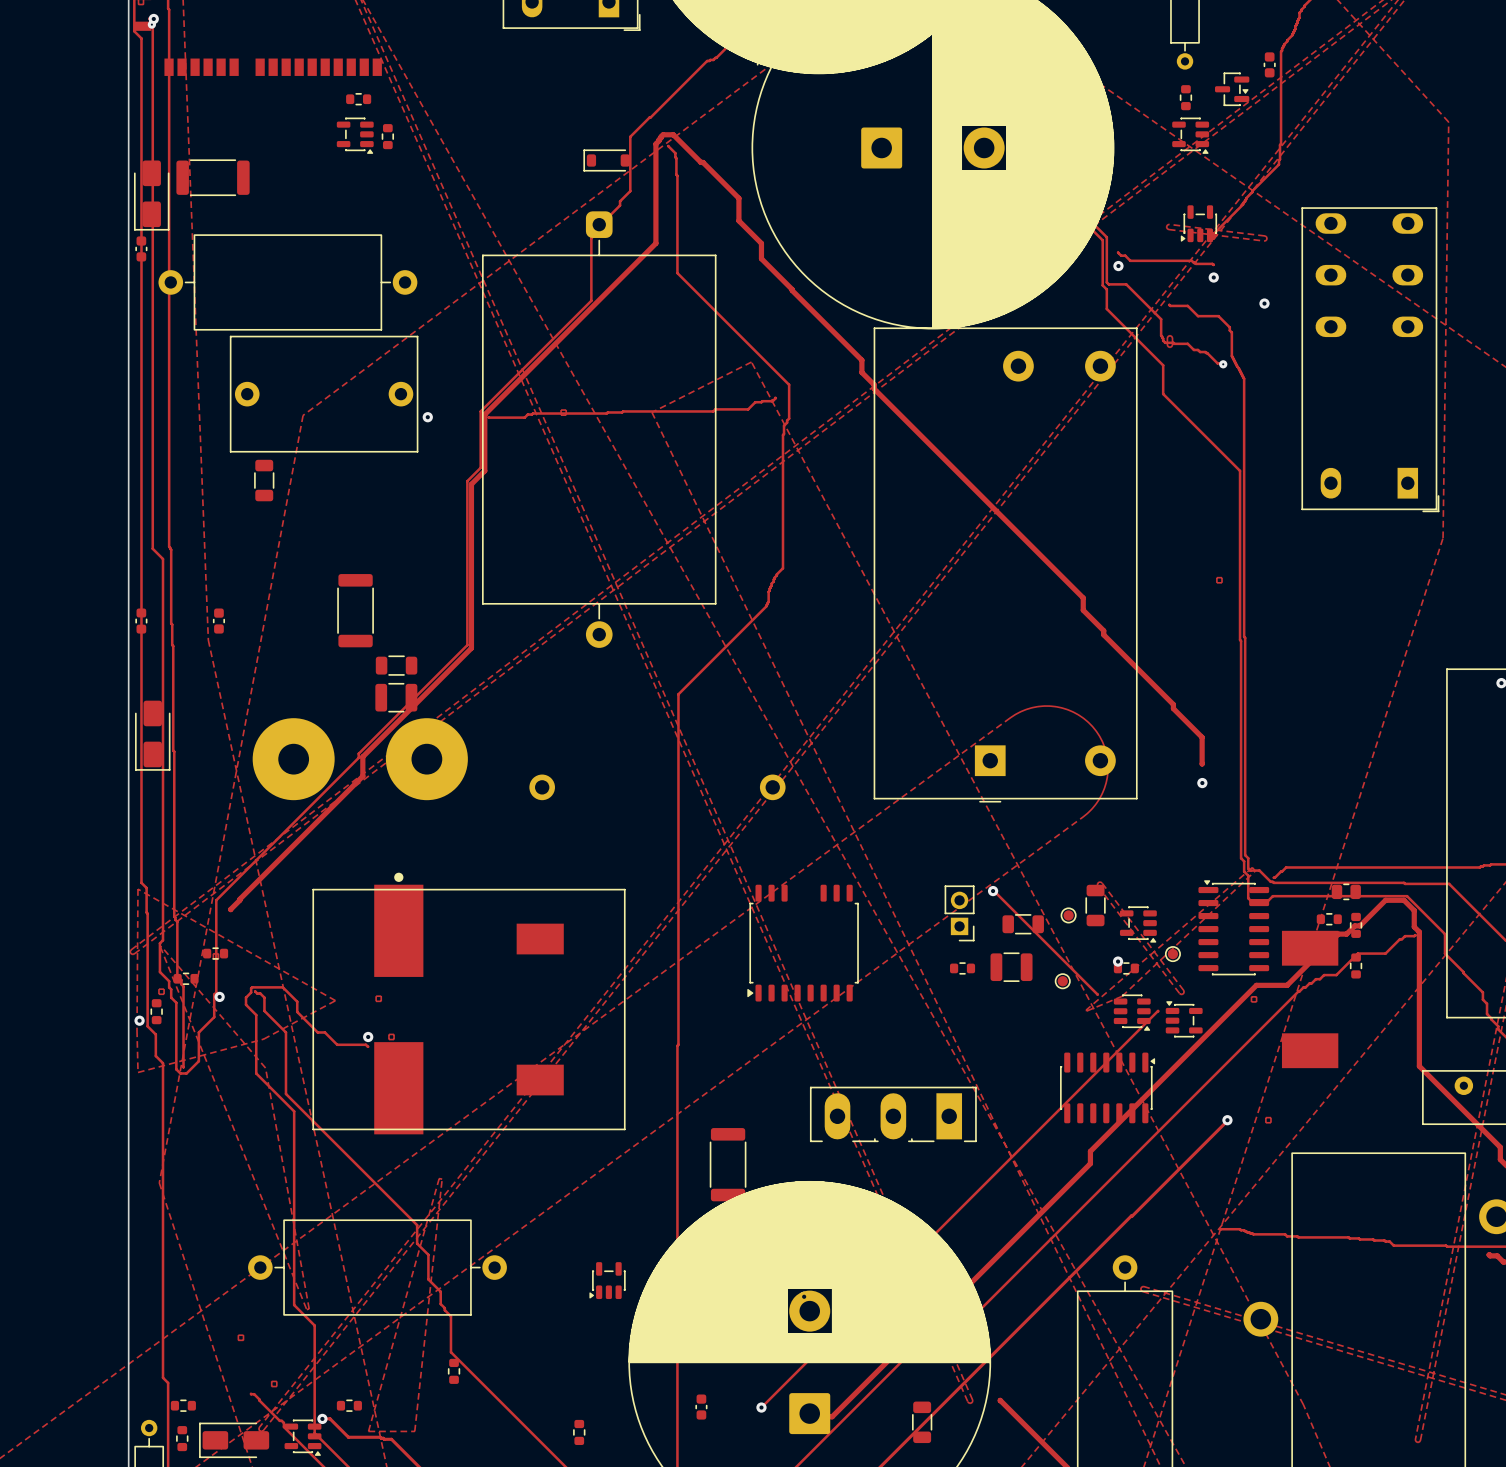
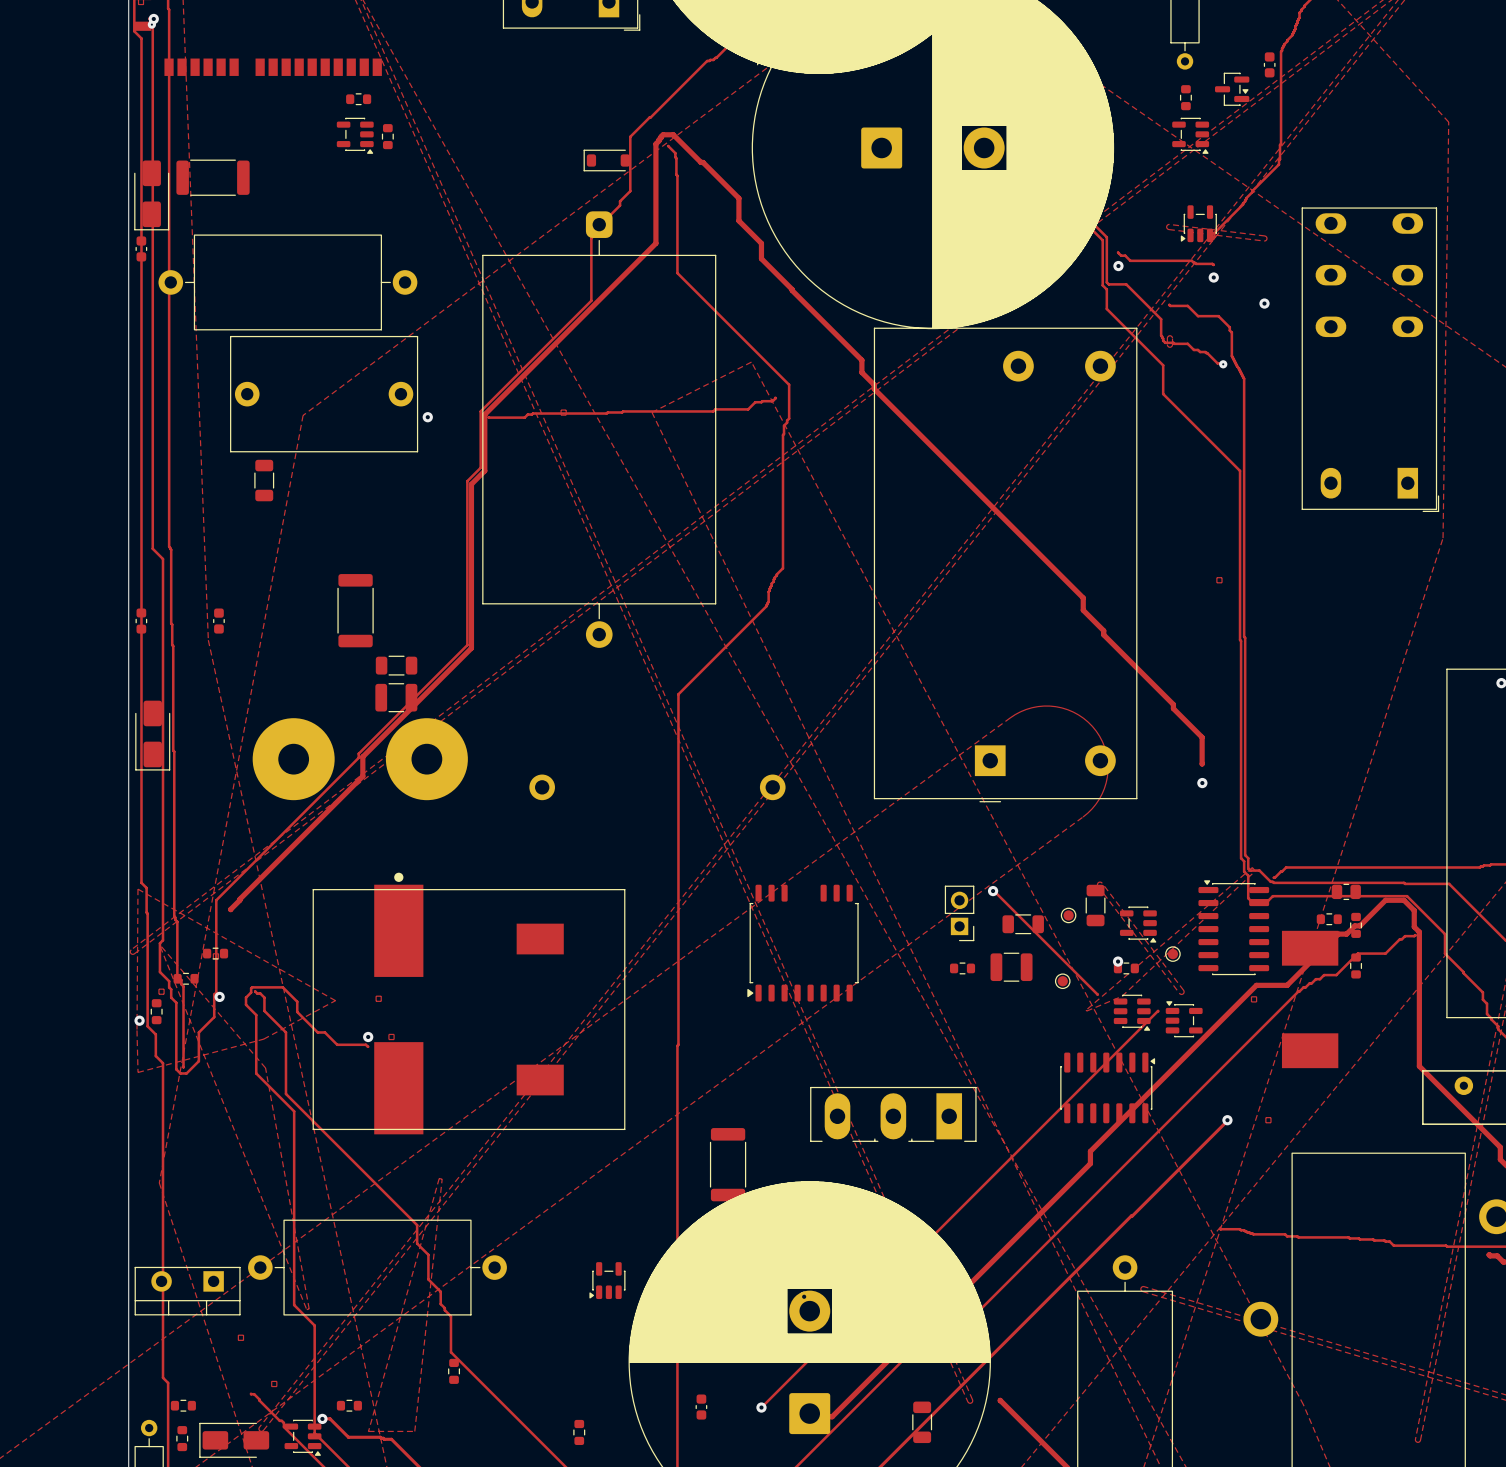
part: none -> (187, 1291)

